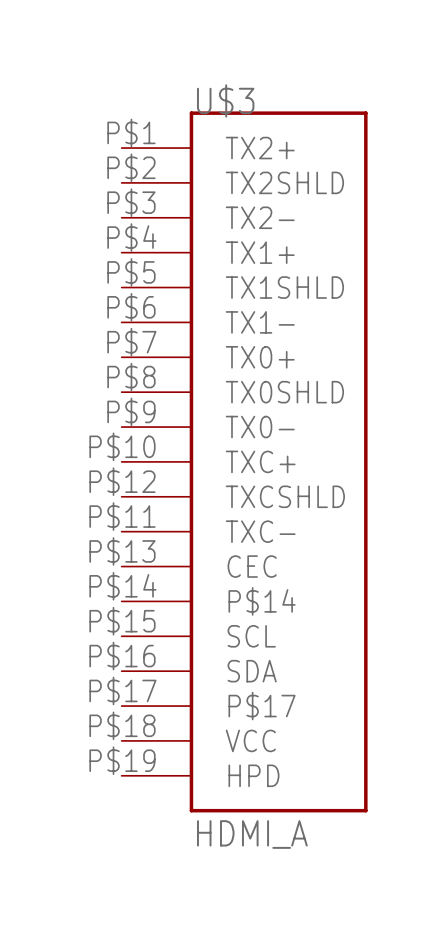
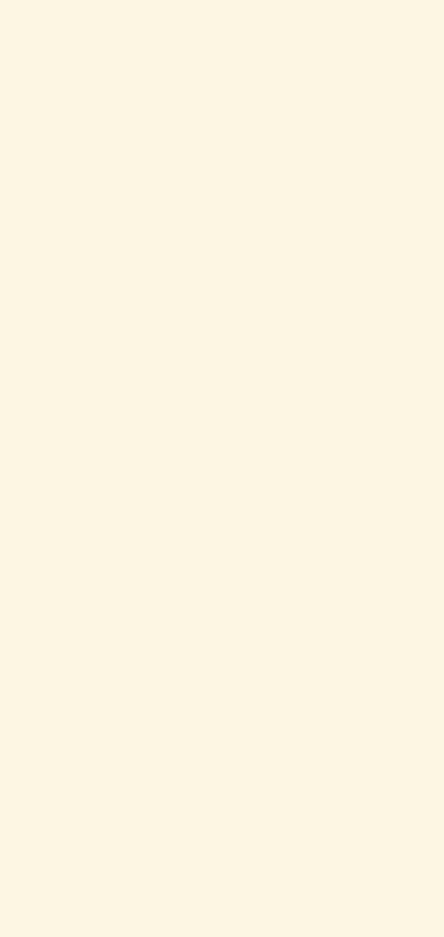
U$3: HDMI_A (244, 461) -> none

